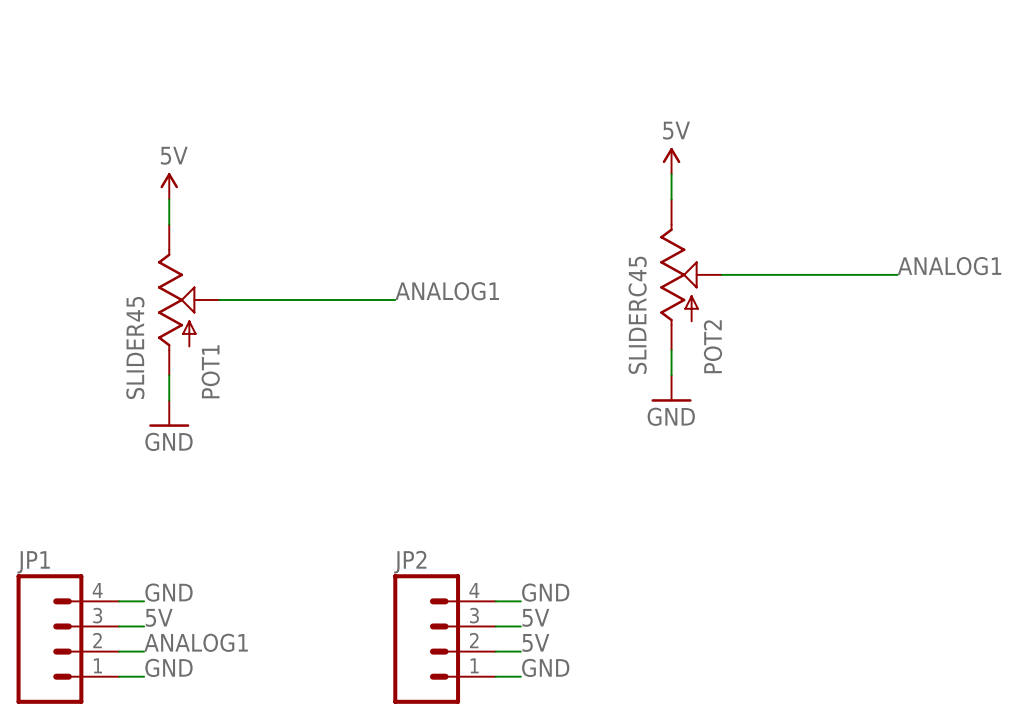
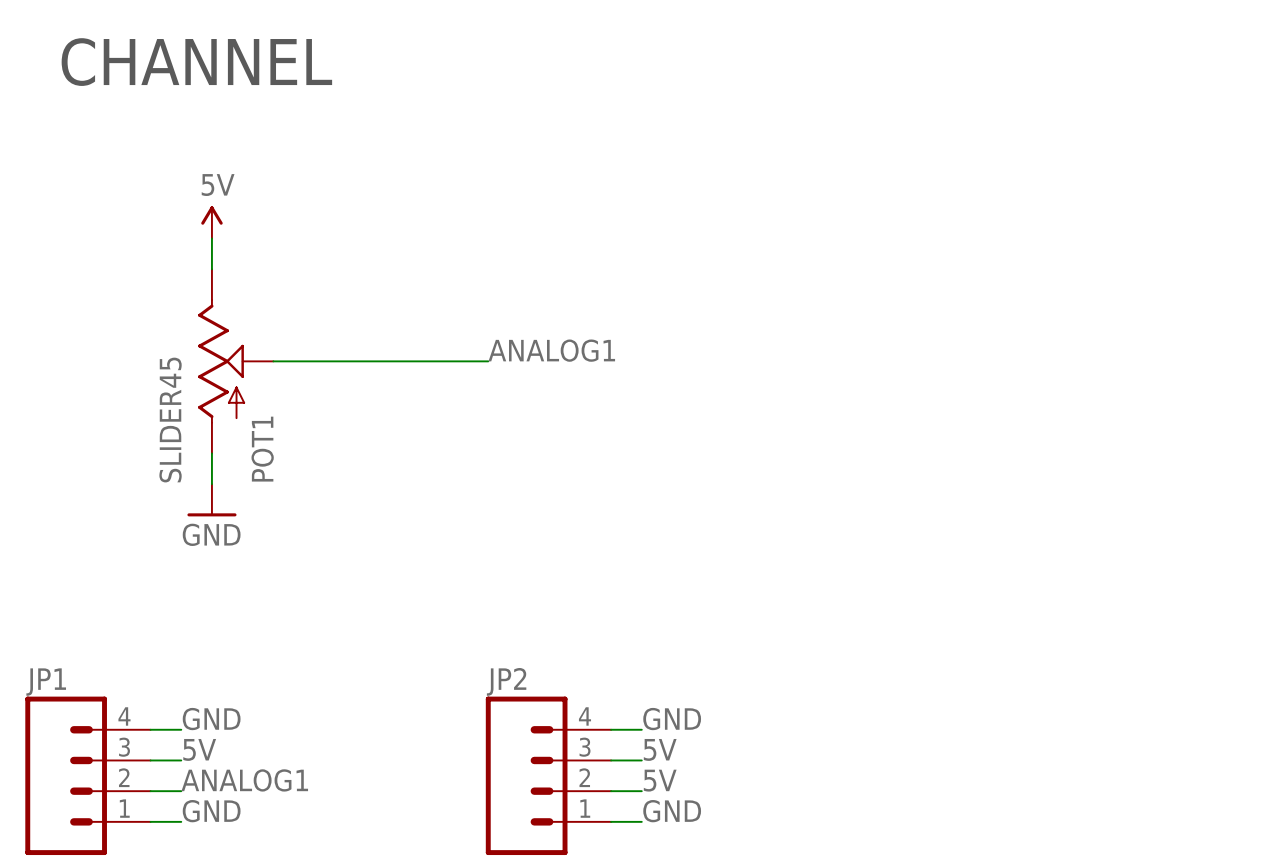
text: none -> CHANNEL (196, 62)
power symbol: 5V (671, 161) -> none
wire: (671, 174) (671, 199) -> none
label: ANALOG1 (949, 266) -> none
POT2: SLIDERC45 (691, 274) -> none
wire: (721, 274) (897, 274) -> none
wire: (671, 350) (671, 375) -> none
power symbol: GND (671, 388) -> none

